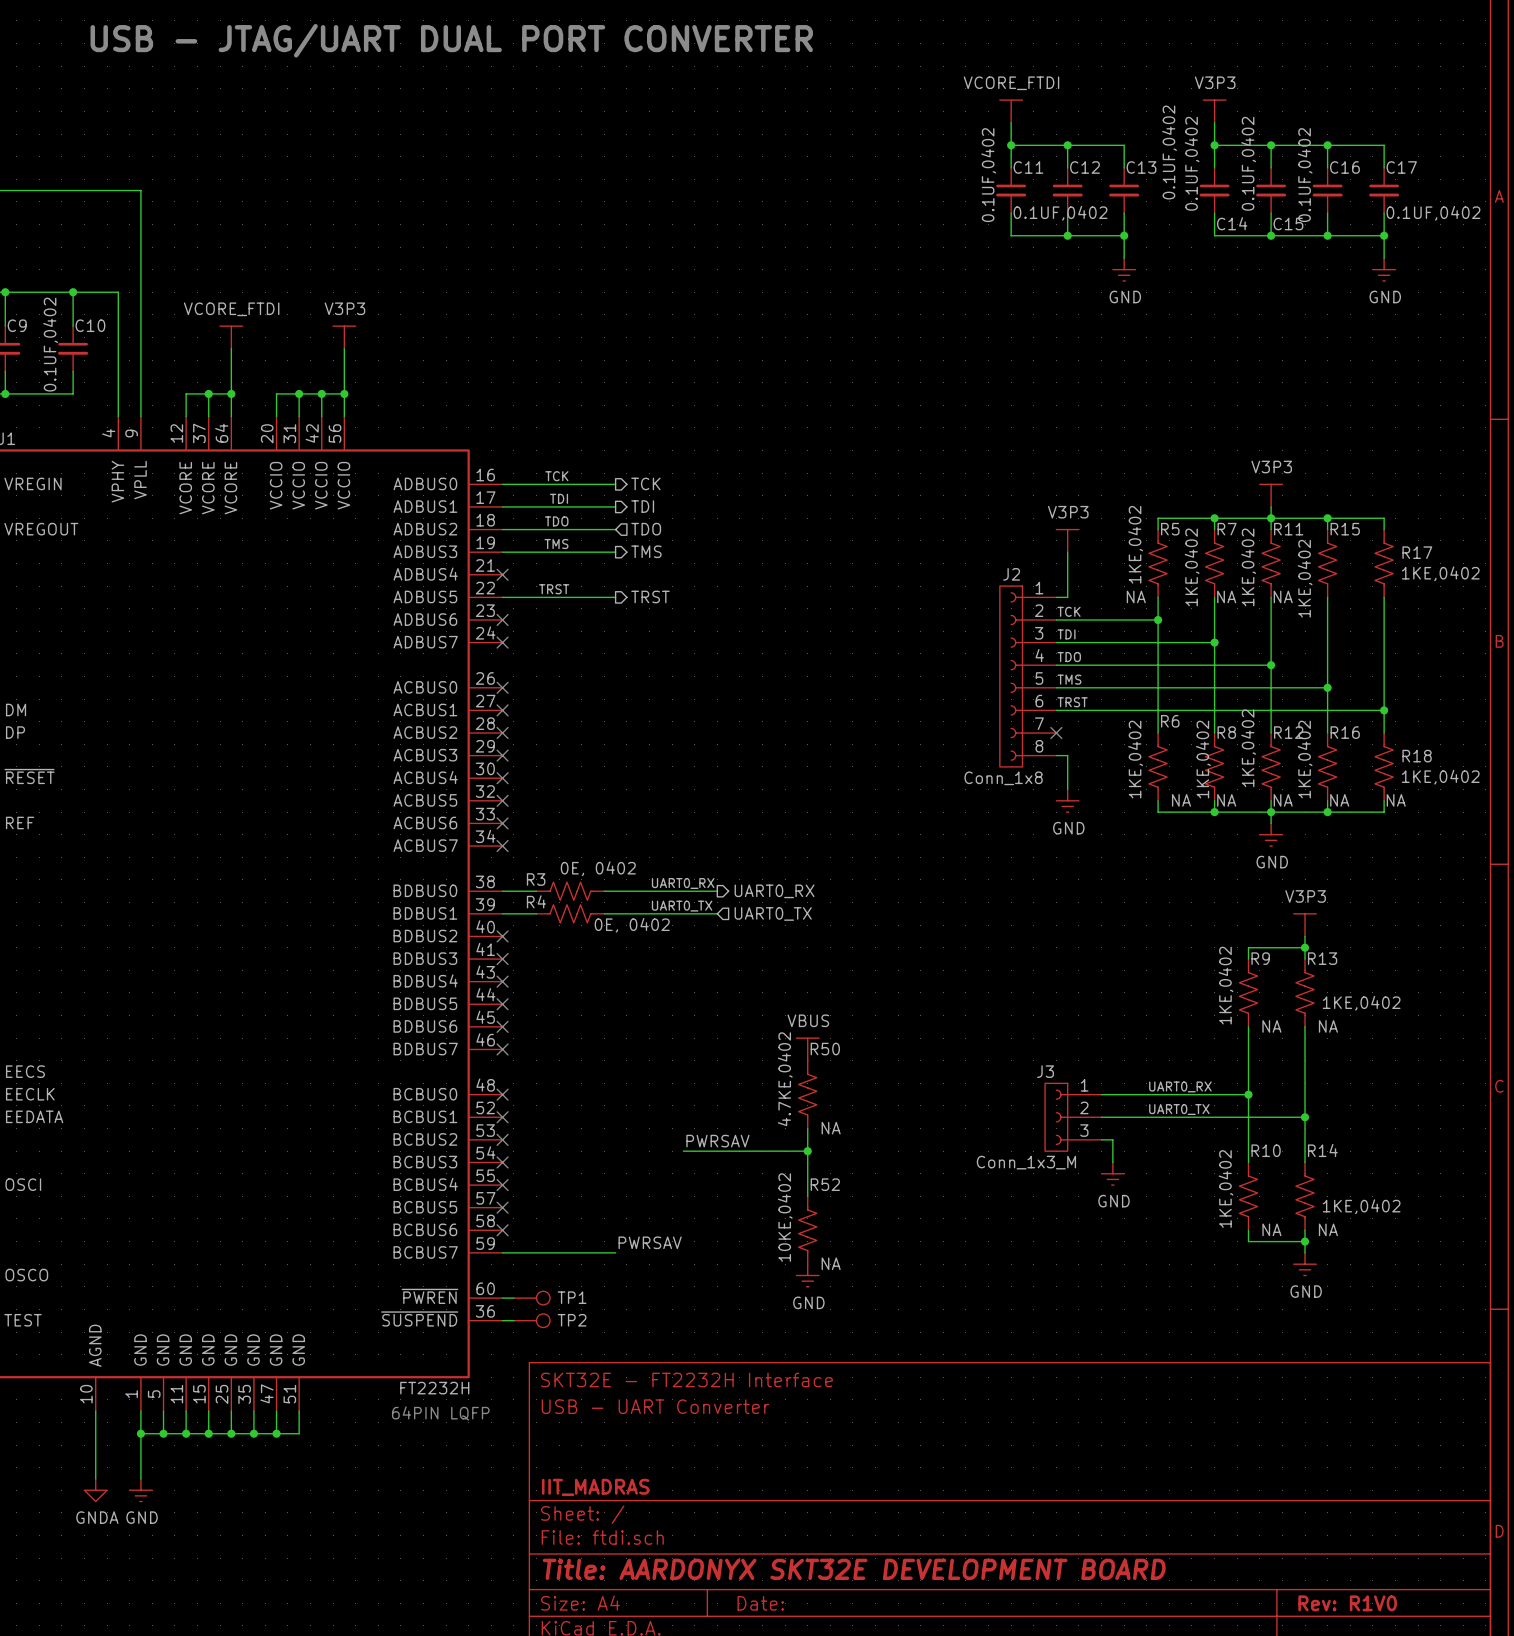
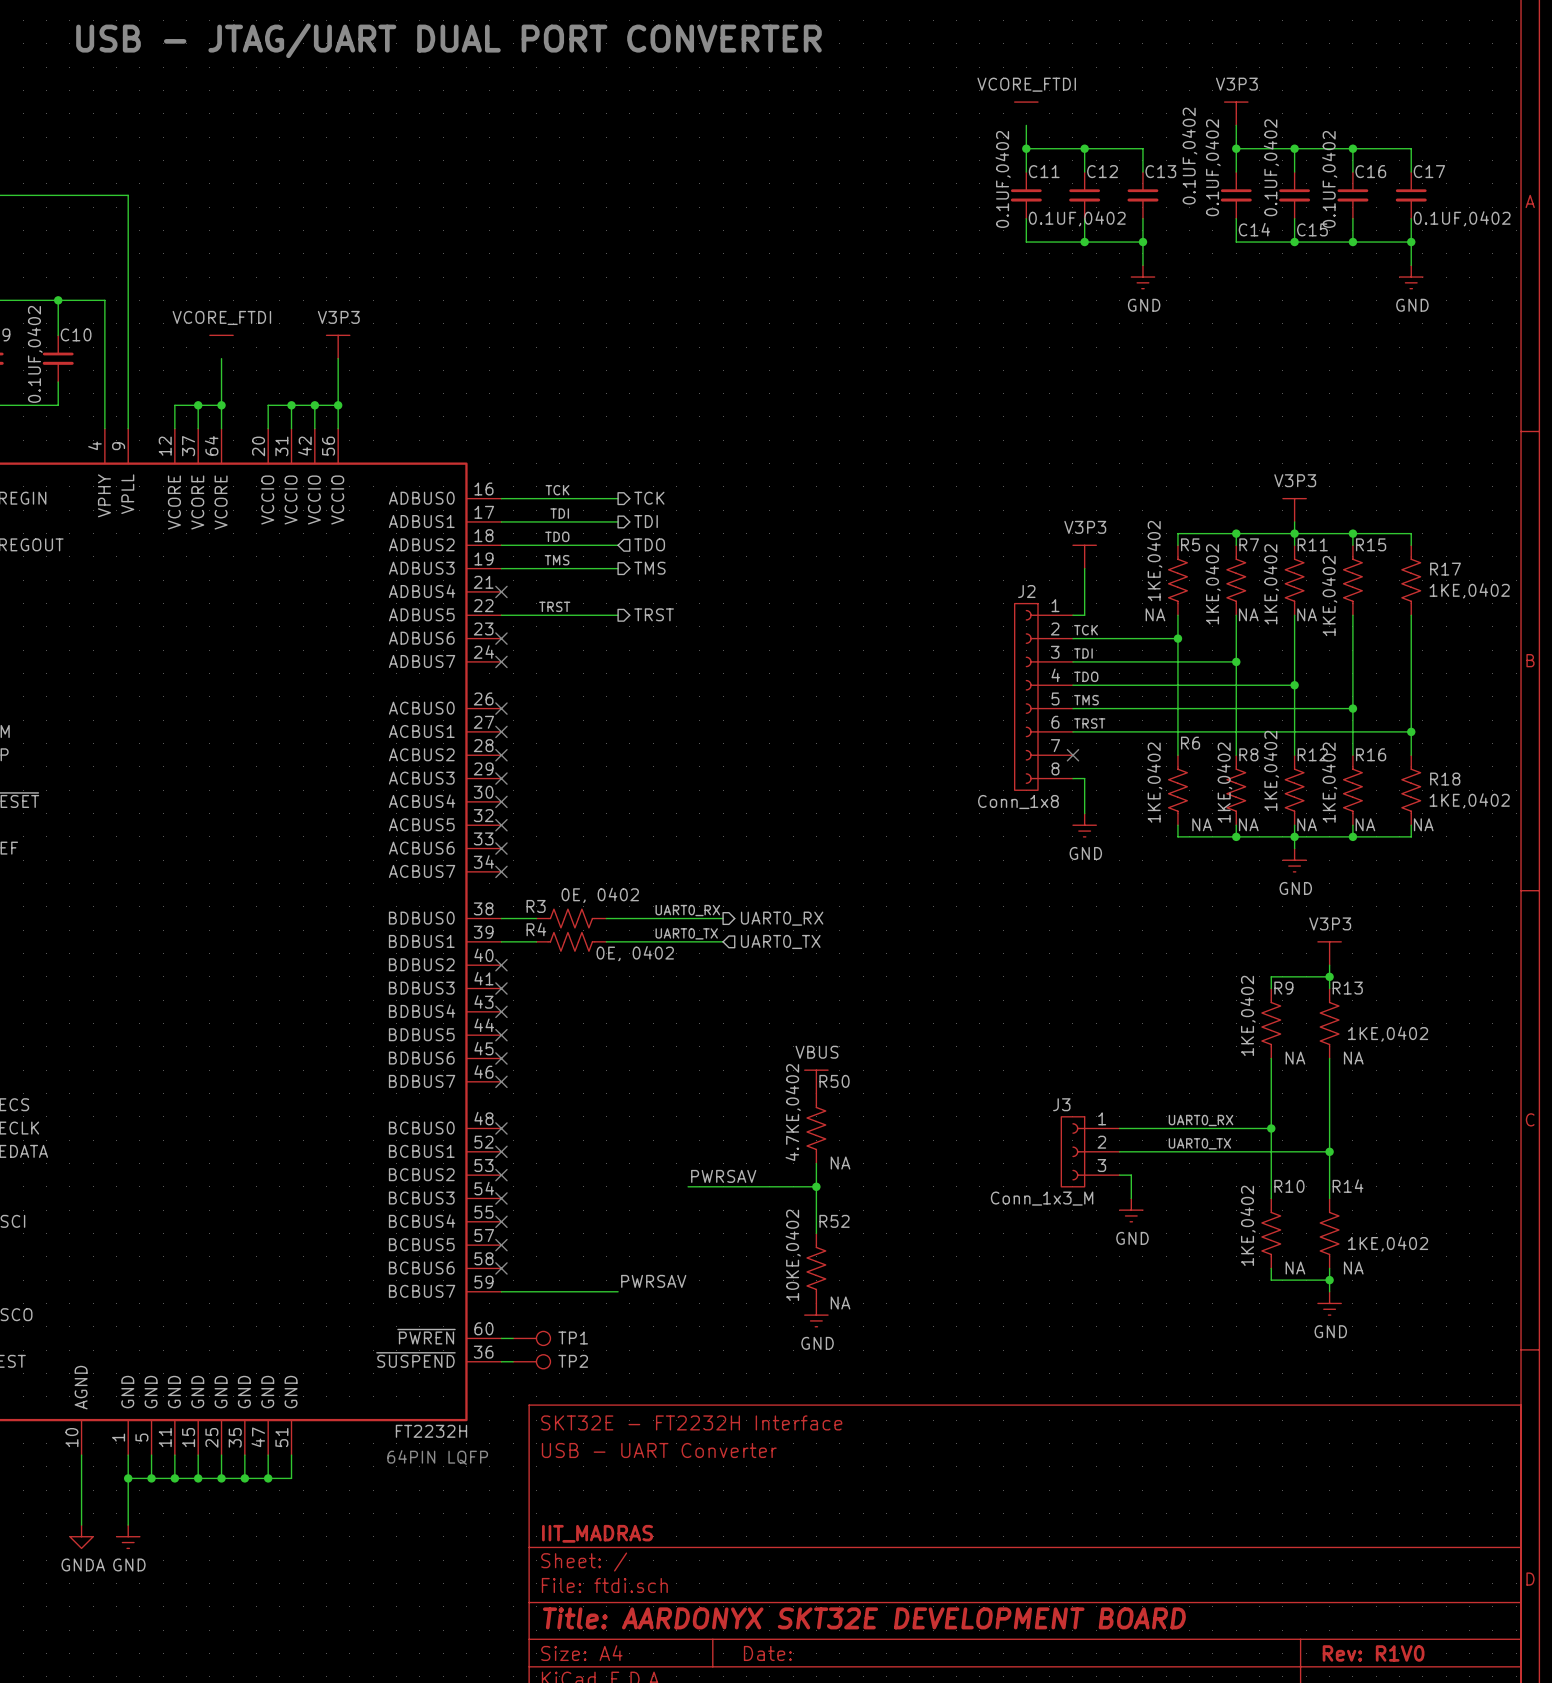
power symbol shape: [999, 100, 1023, 123] -> [1014, 102, 1038, 126]
power symbol shape: [220, 326, 243, 349] -> [209, 335, 234, 359]

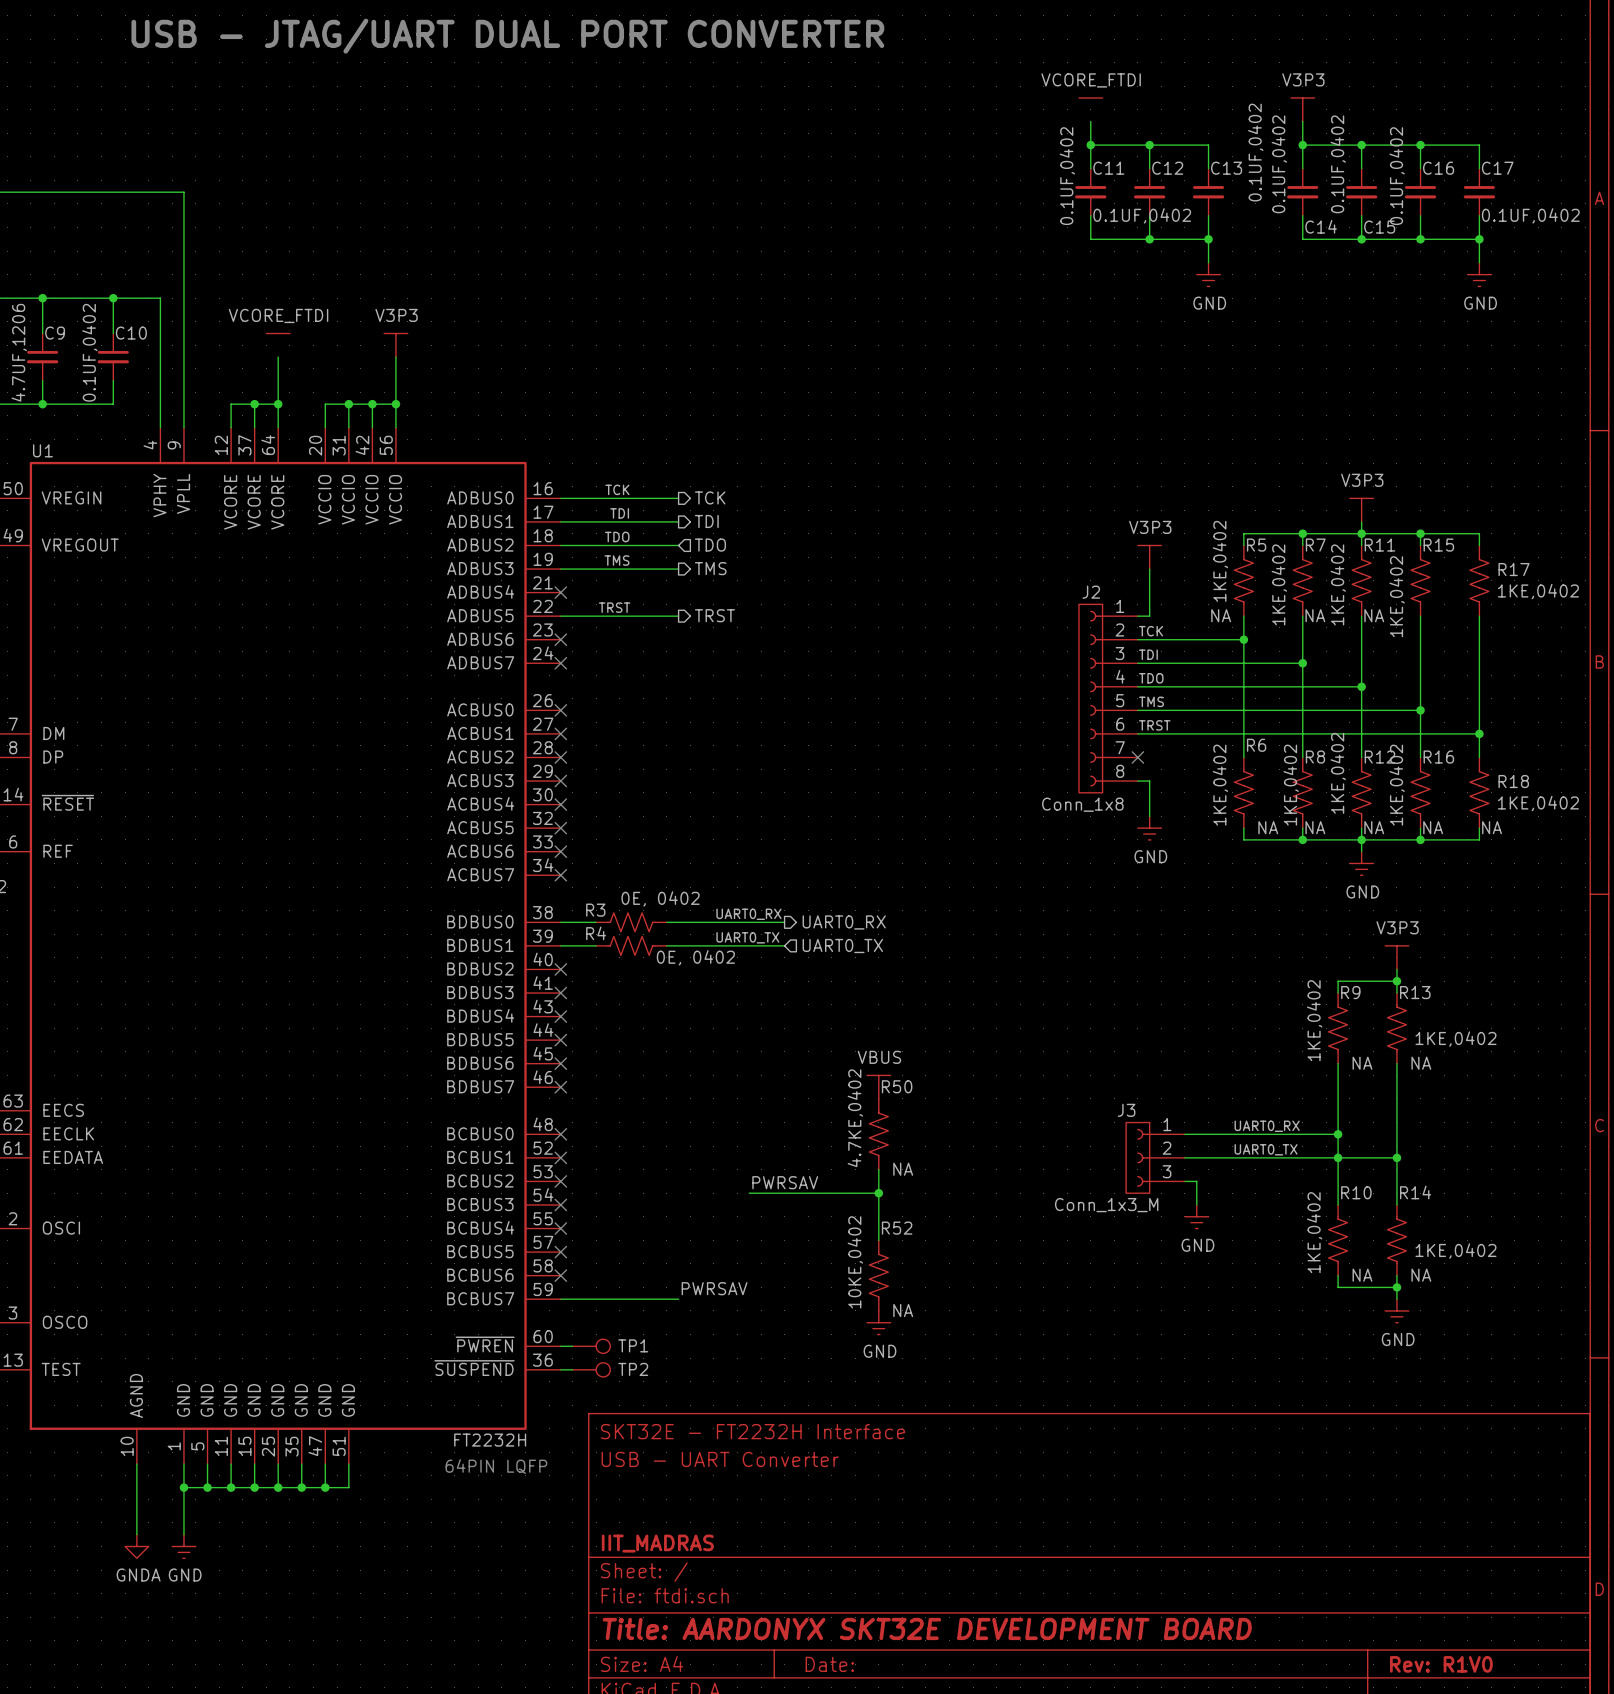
junction: none -> (1338, 1157)

